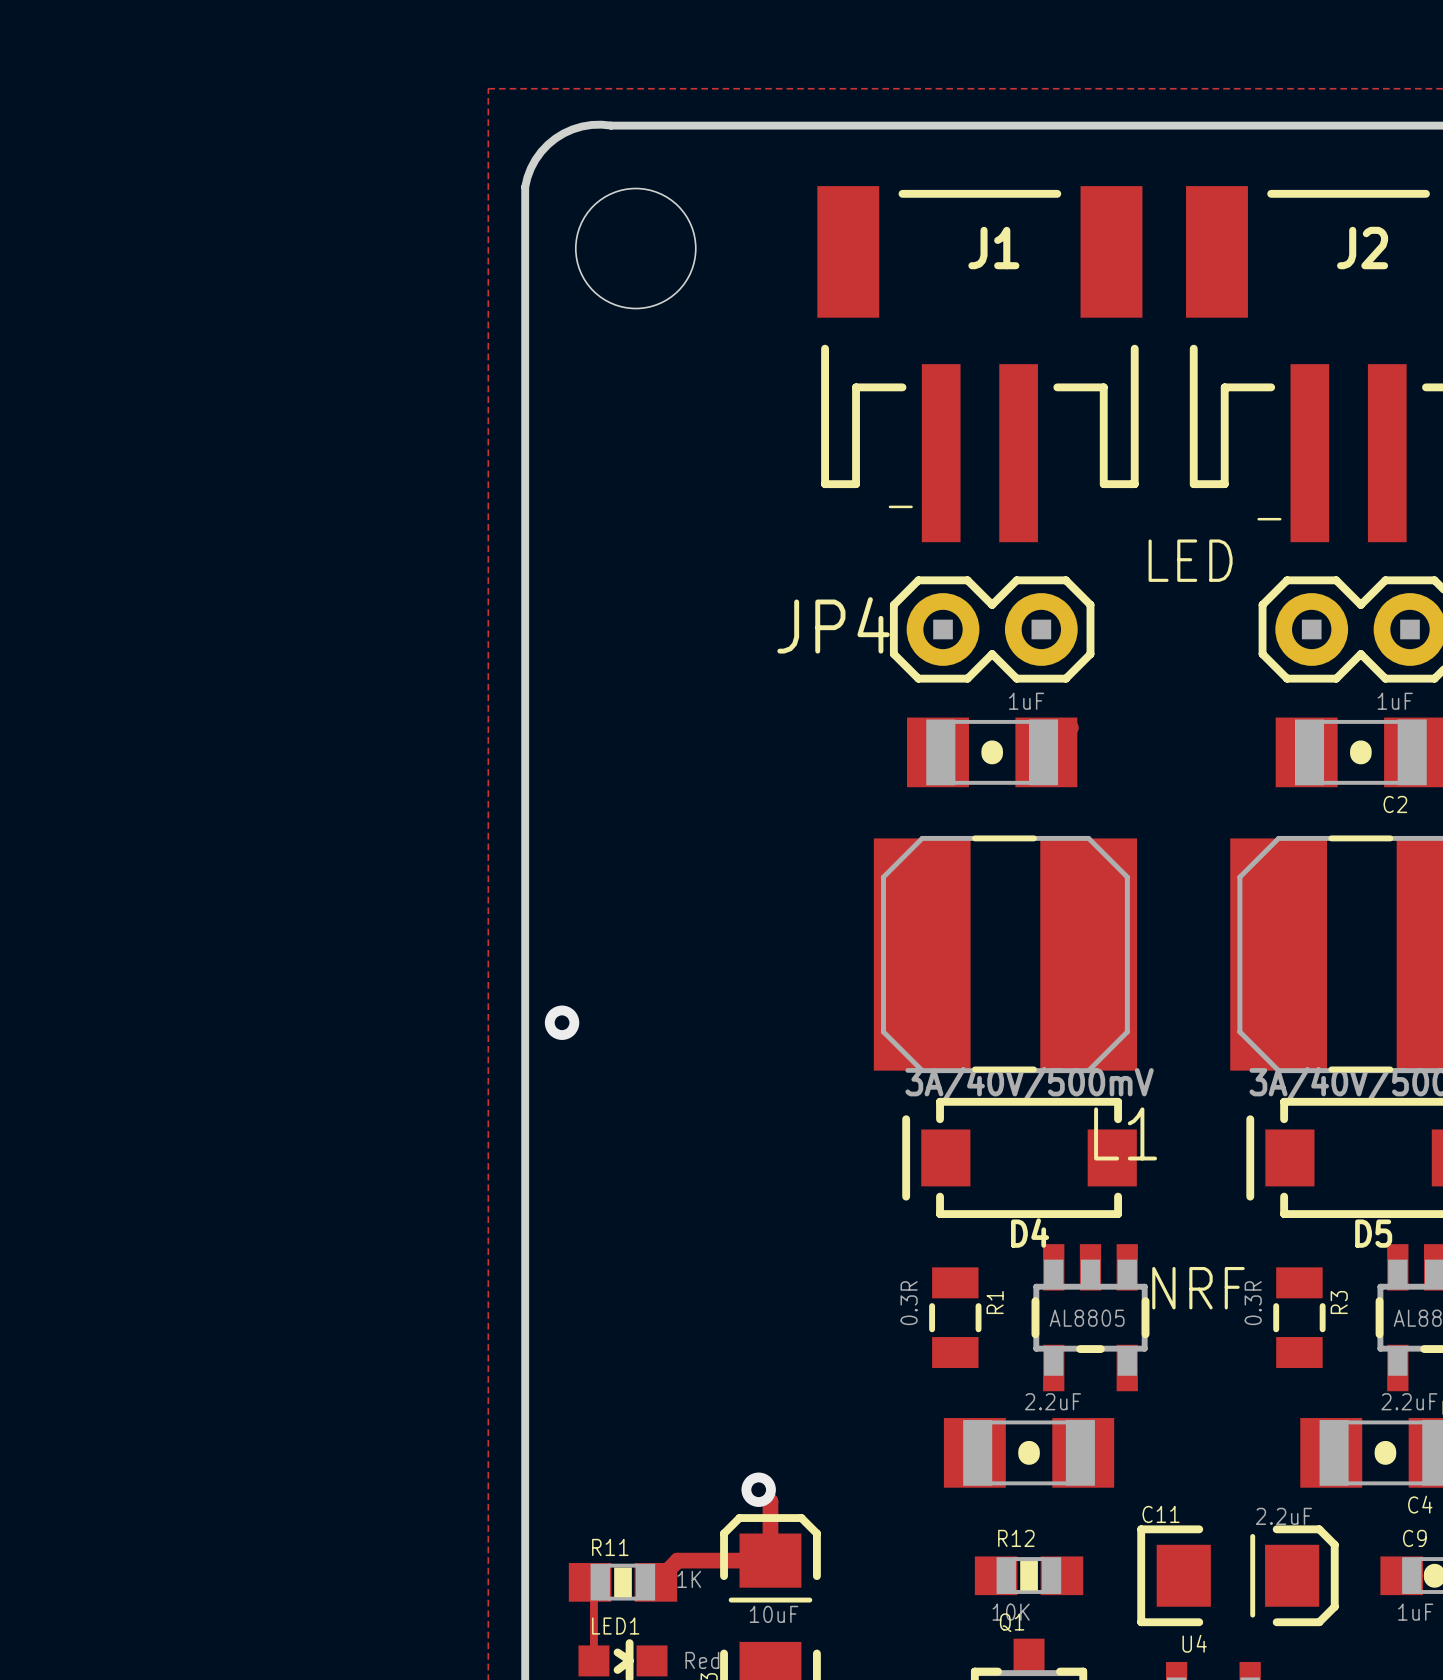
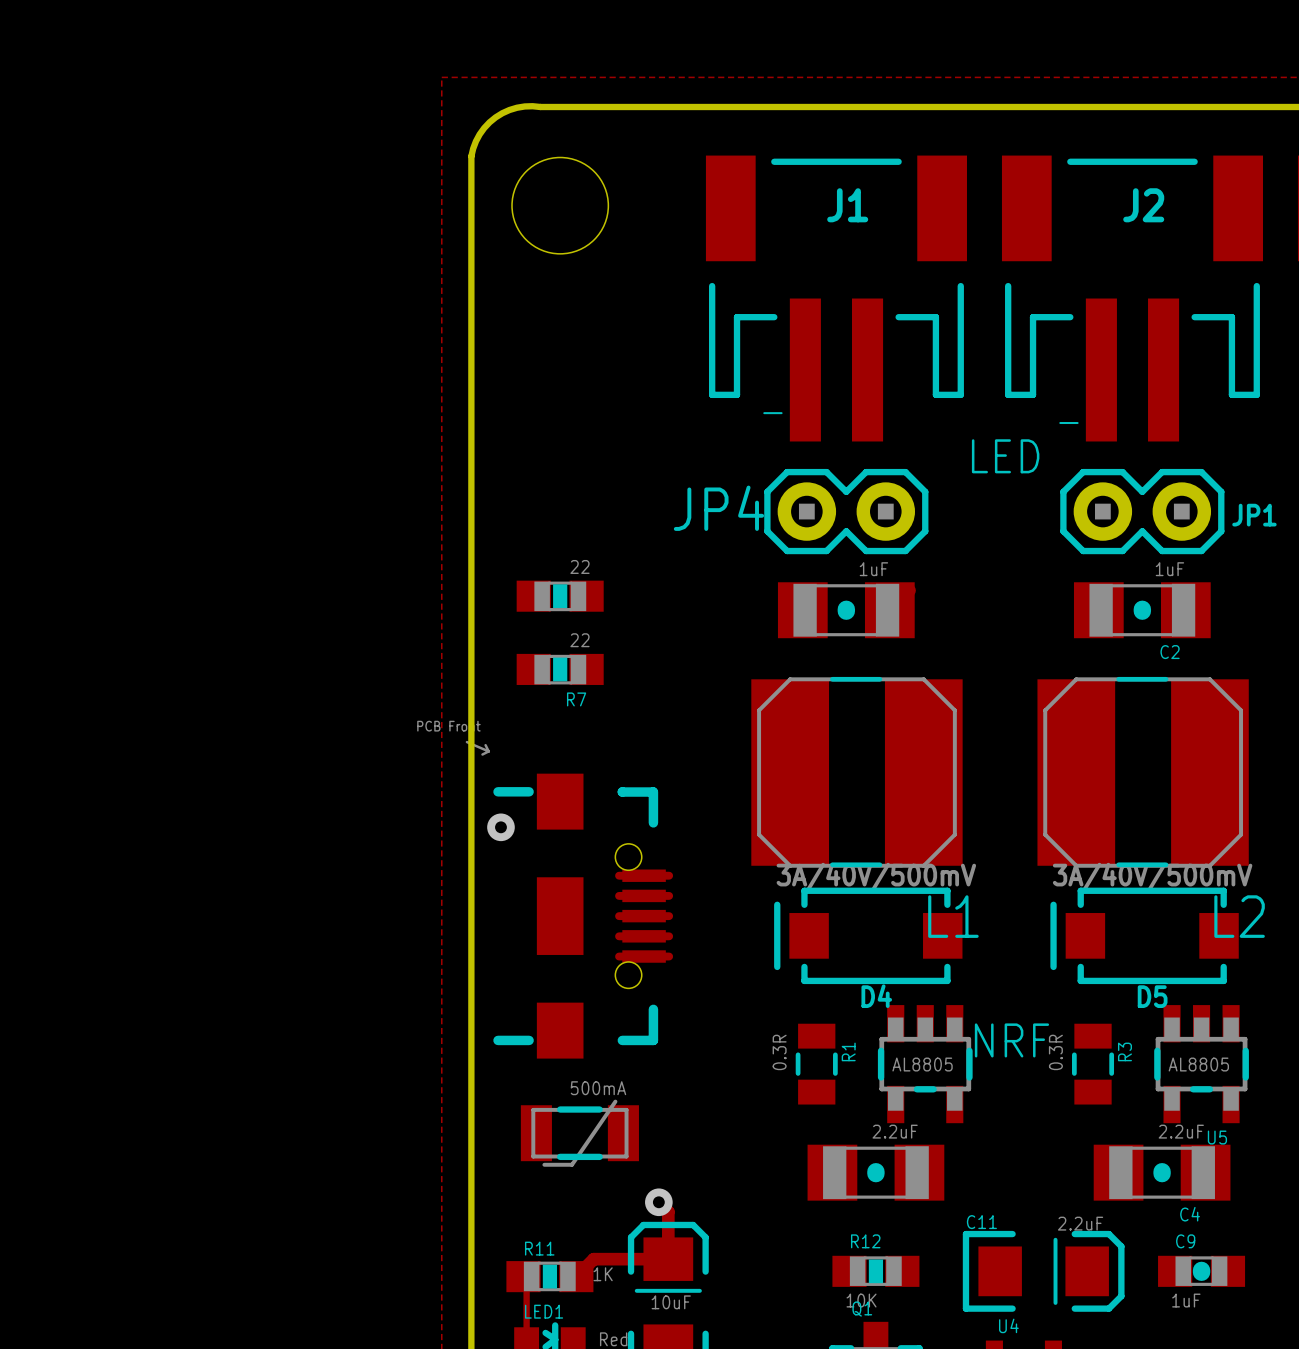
part: none -> 22 (560, 596)
R7: none -> 22 (560, 669)
part: none -> (569, 899)
part: none -> 500mA (579, 1133)

